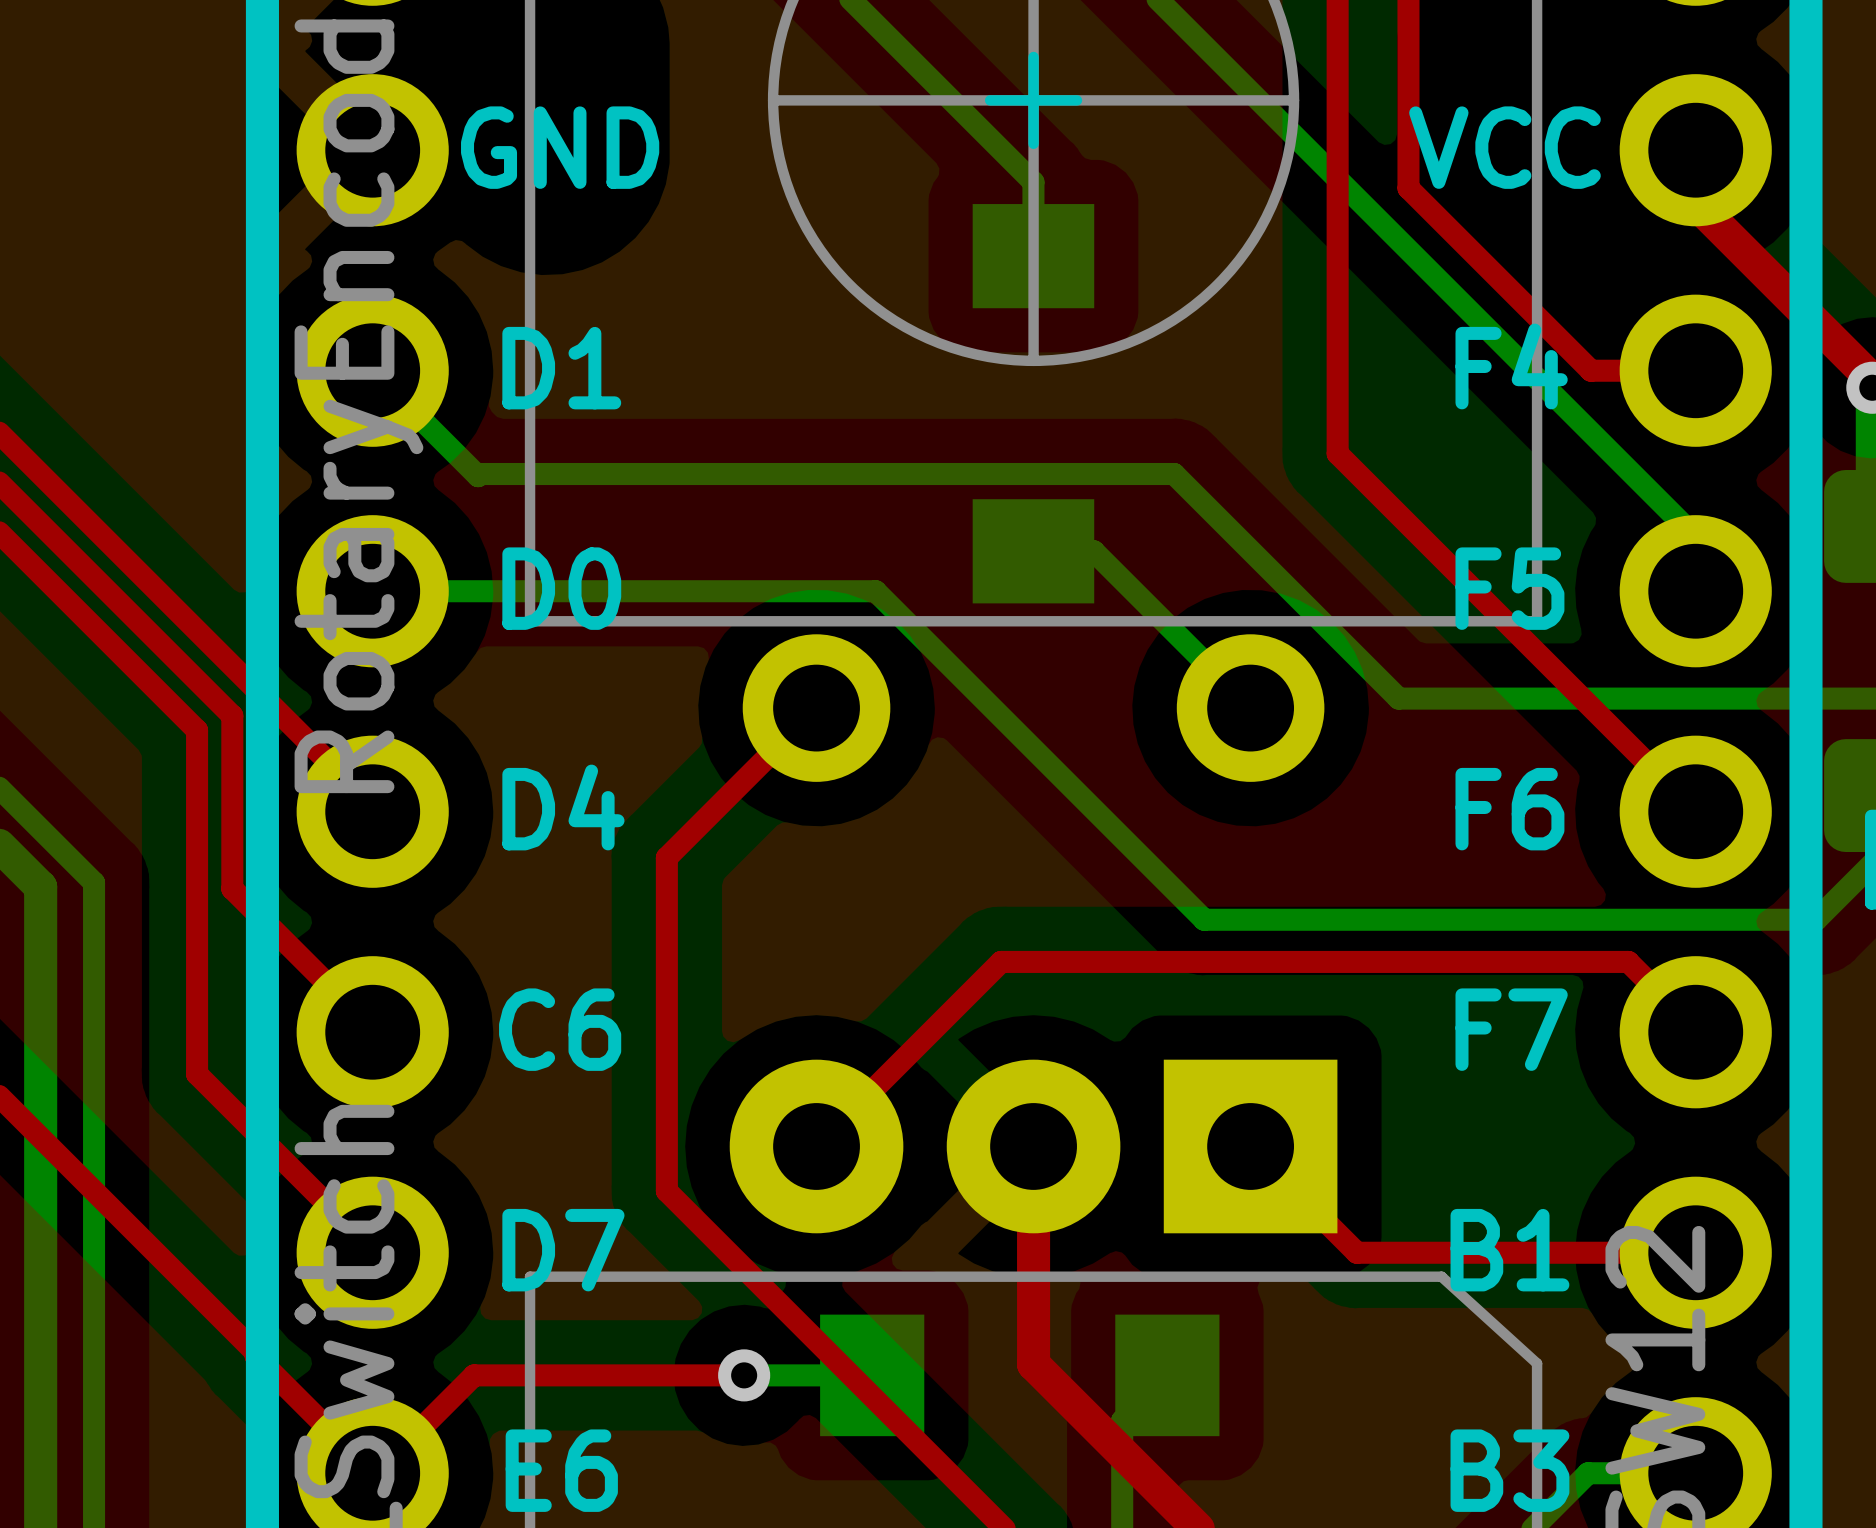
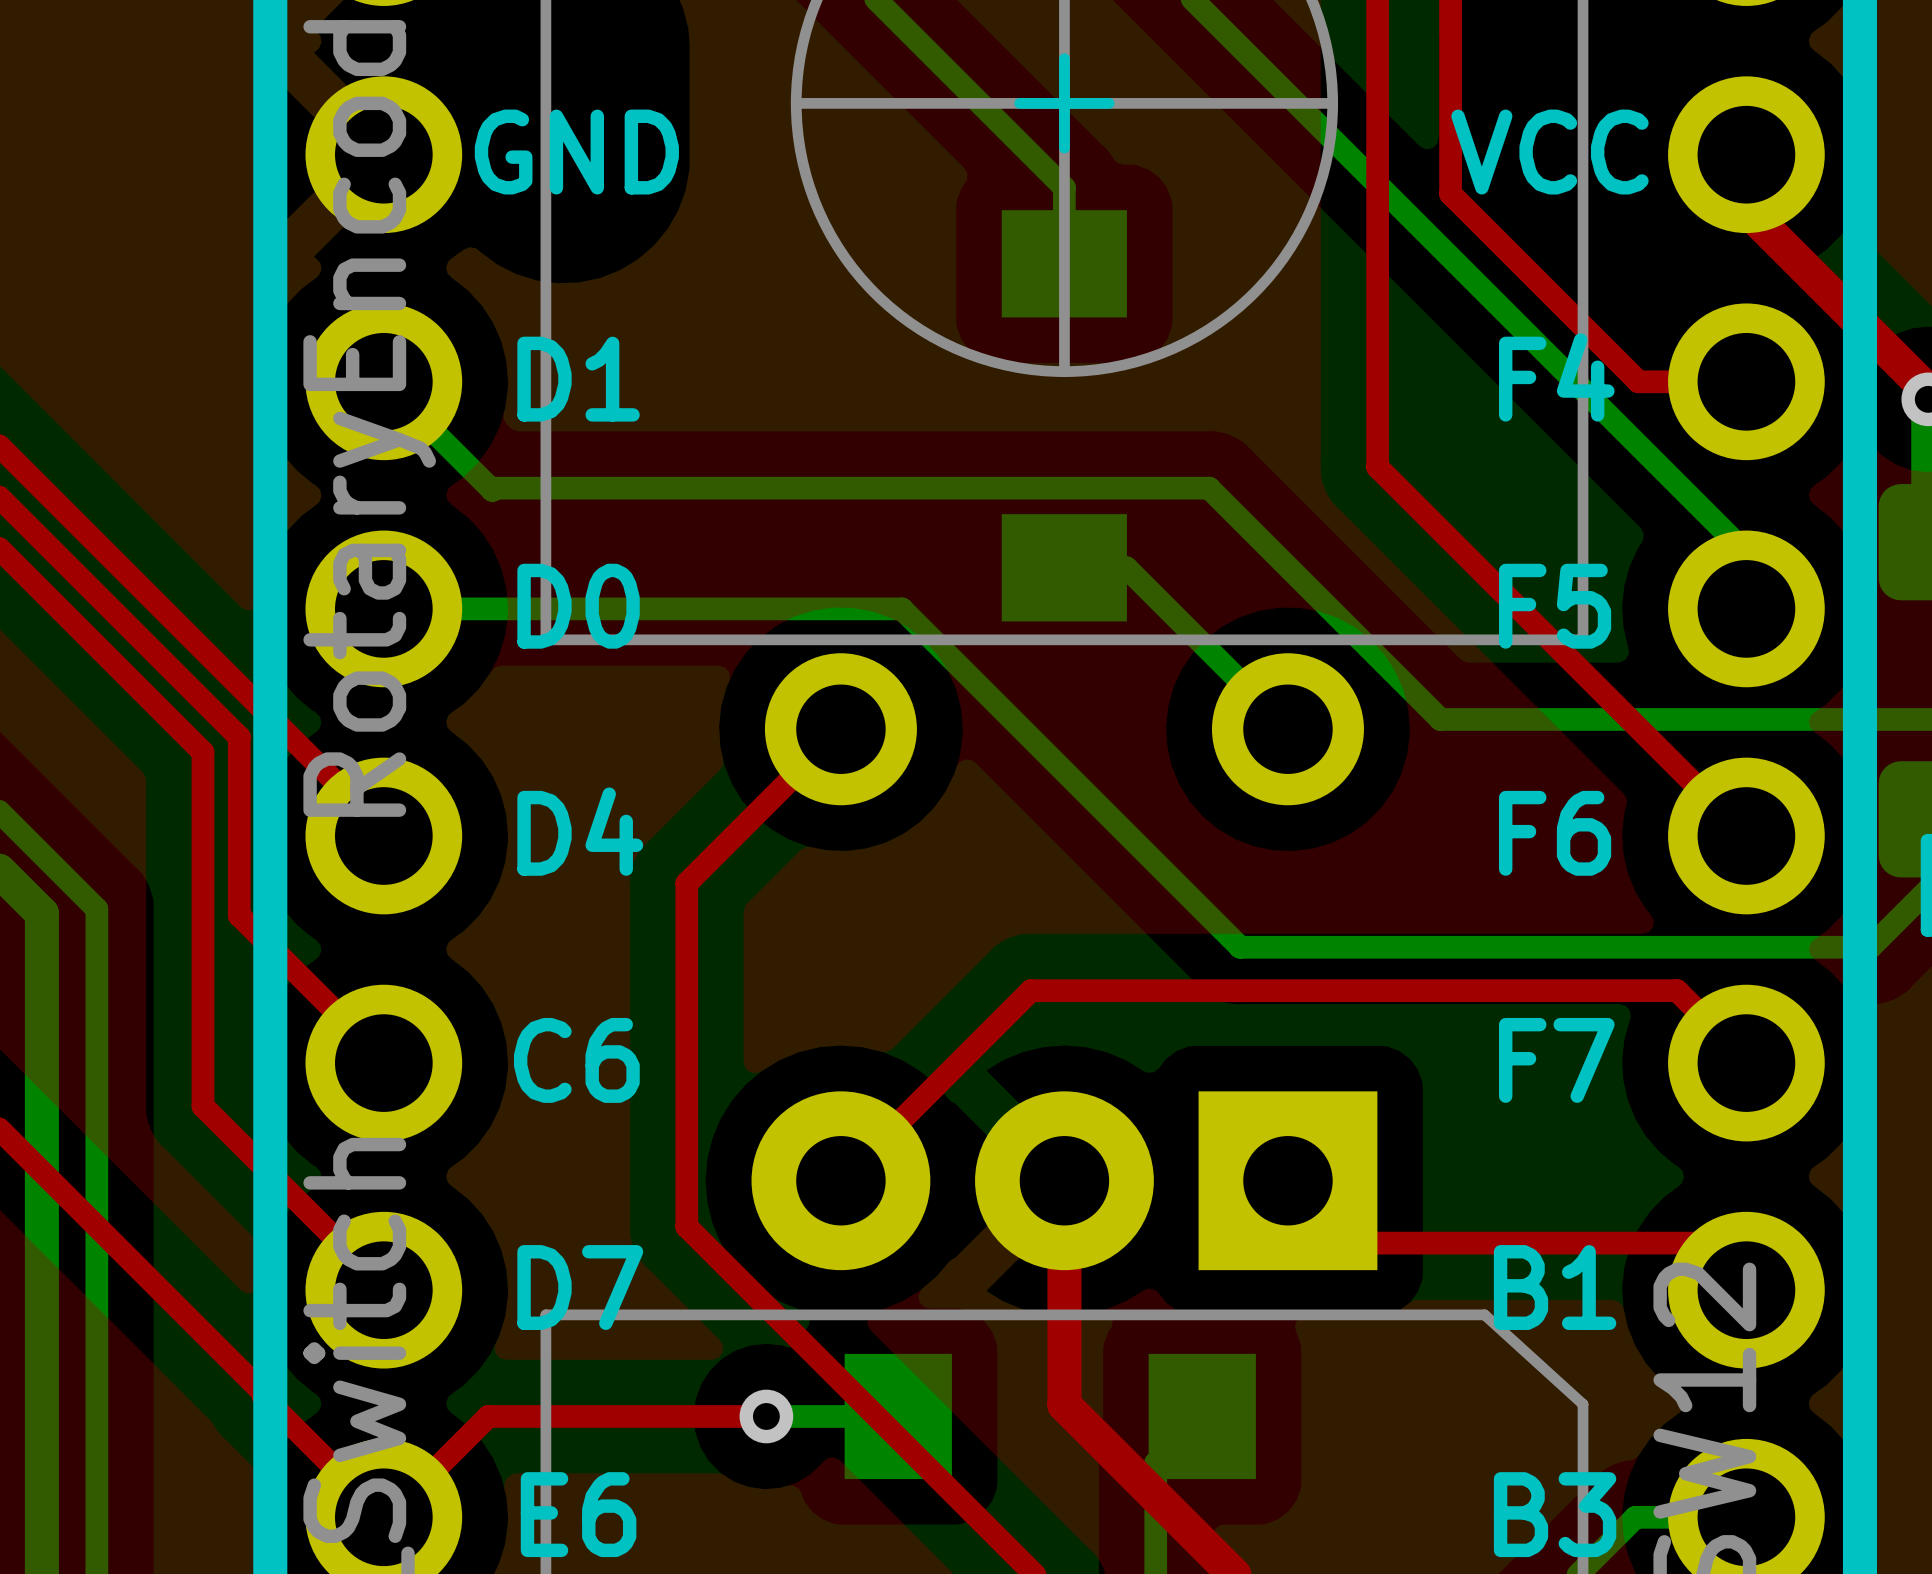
top track: (1311, 1207) (1356, 1252) (1695, 1252) -> (1350, 1243) (1699, 1243) (1746, 1290)

